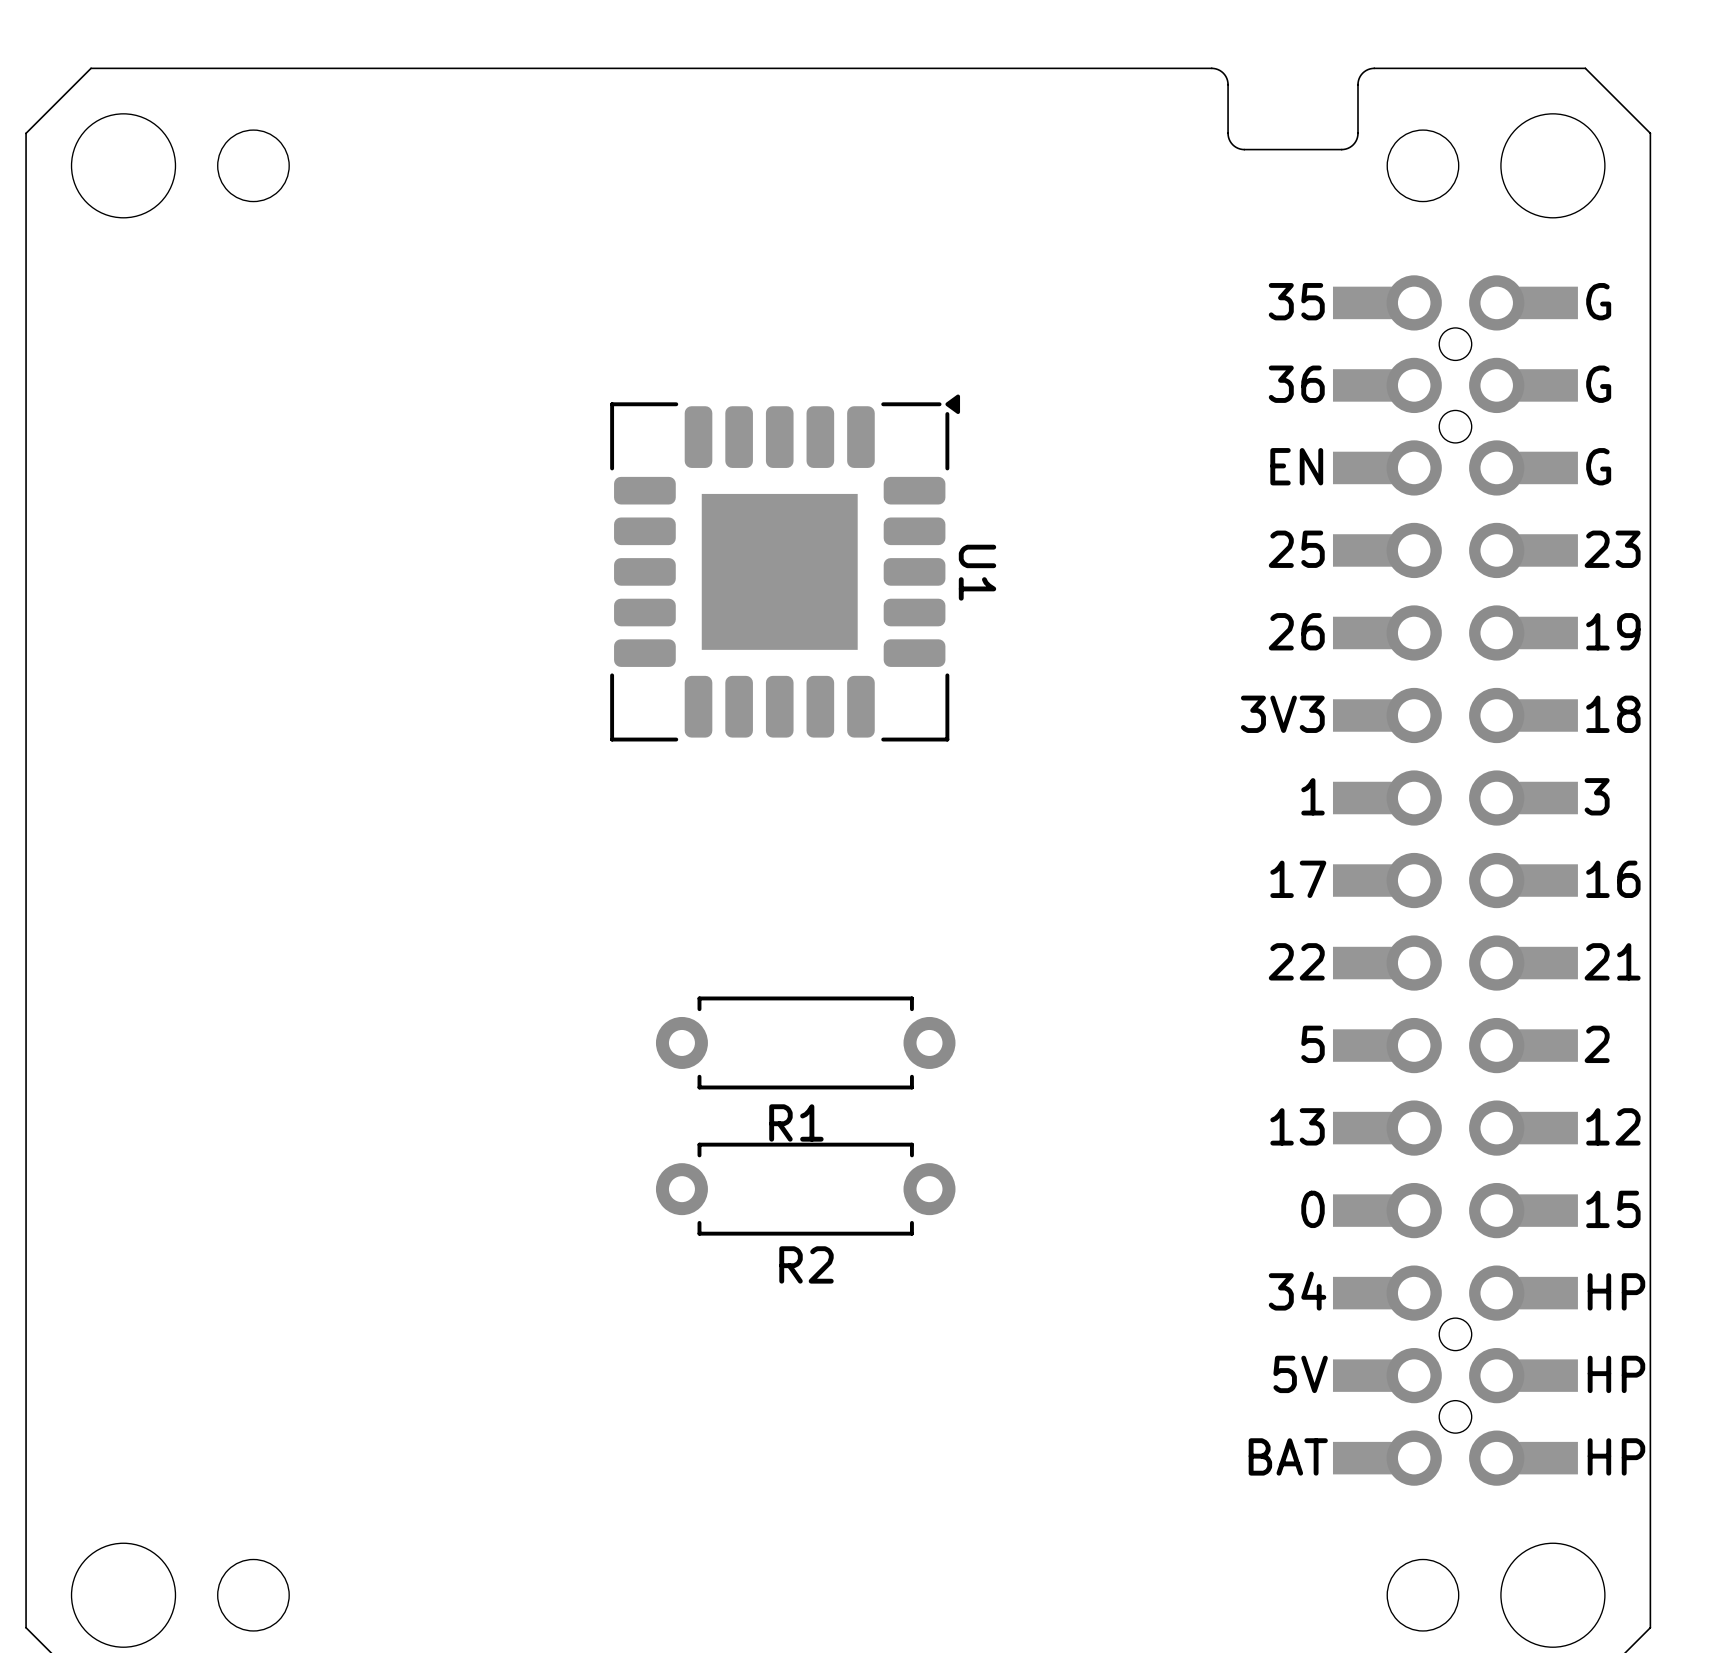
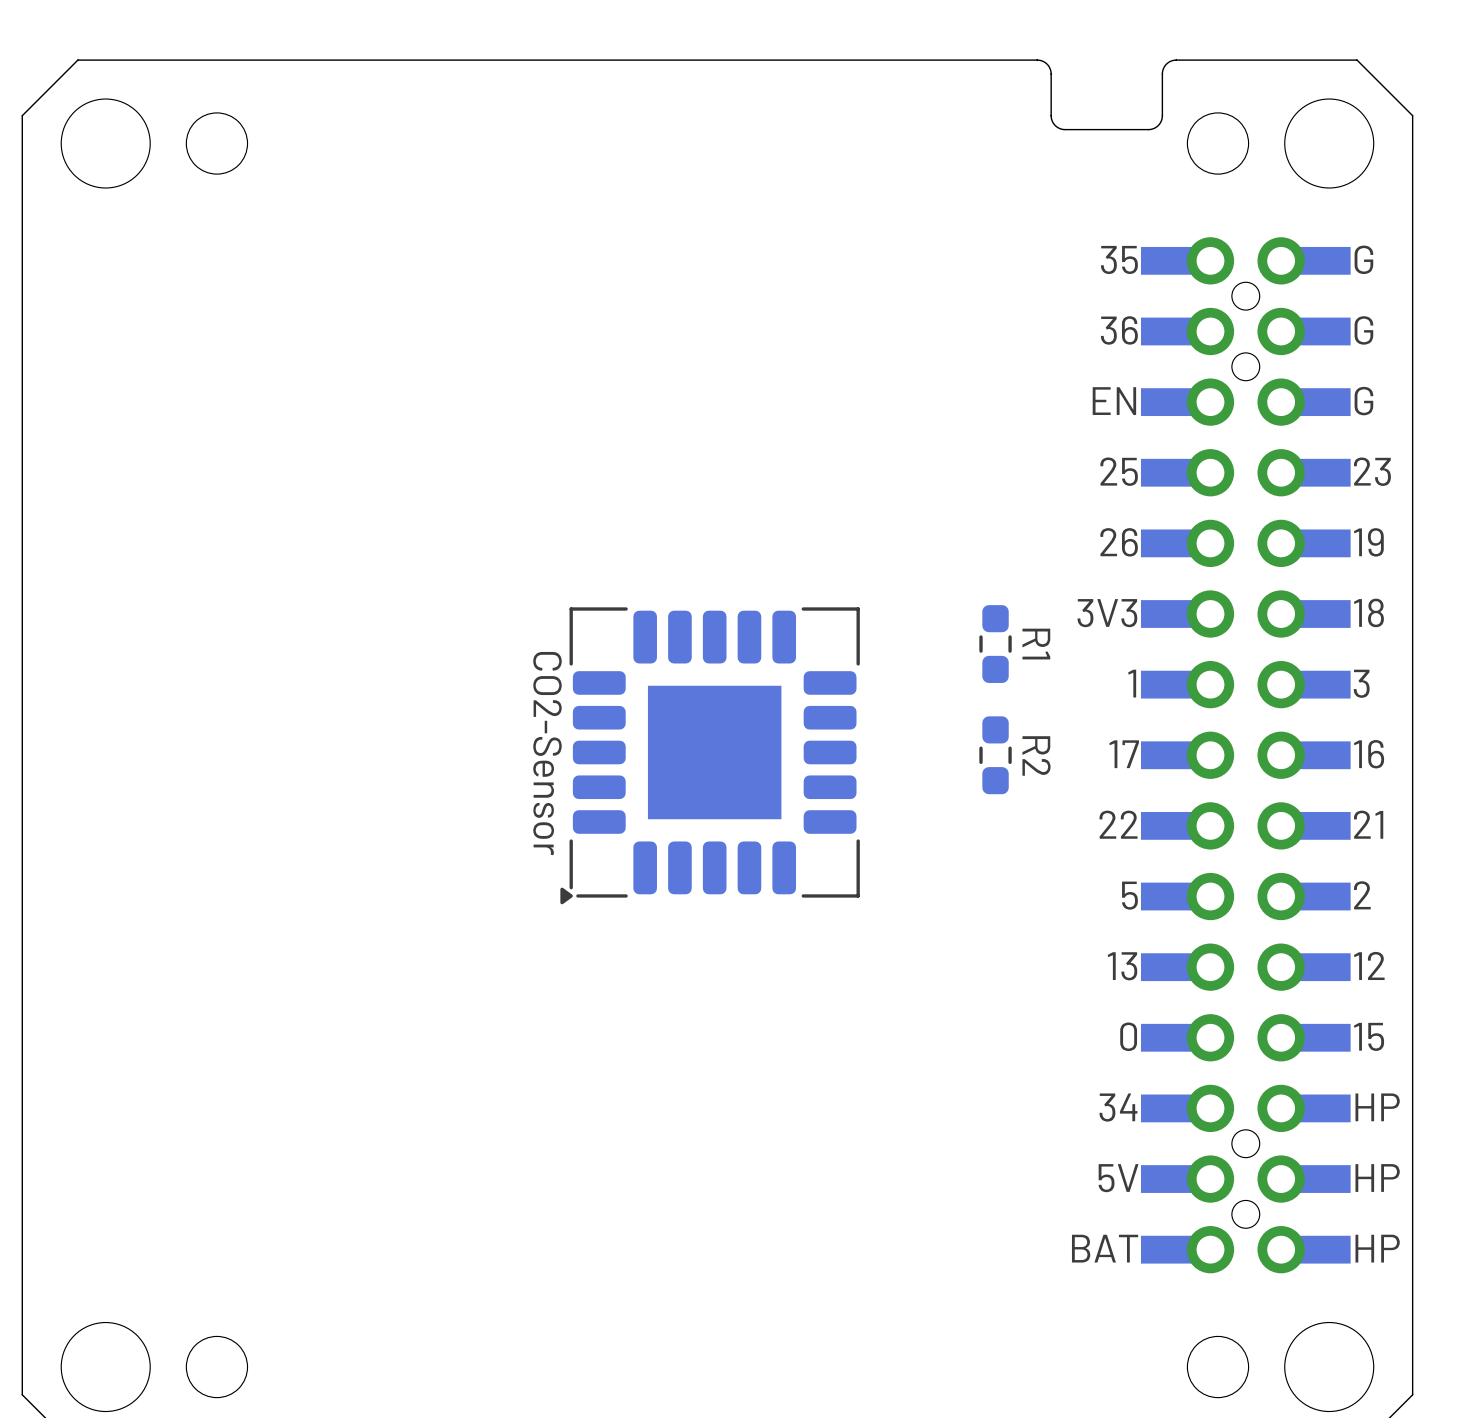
U1: (785, 568) -> none
CO2-Sensor: none -> (710, 755)
R1 footprint: [655, 996, 956, 1090] -> [979, 605, 1012, 683]
R1 name position: R1 (796, 1122) -> R1 (1036, 644)
R2 footprint: [655, 1142, 956, 1236] -> [979, 716, 1012, 795]
R2 name position: R2 (806, 1264) -> R2 (1036, 755)

